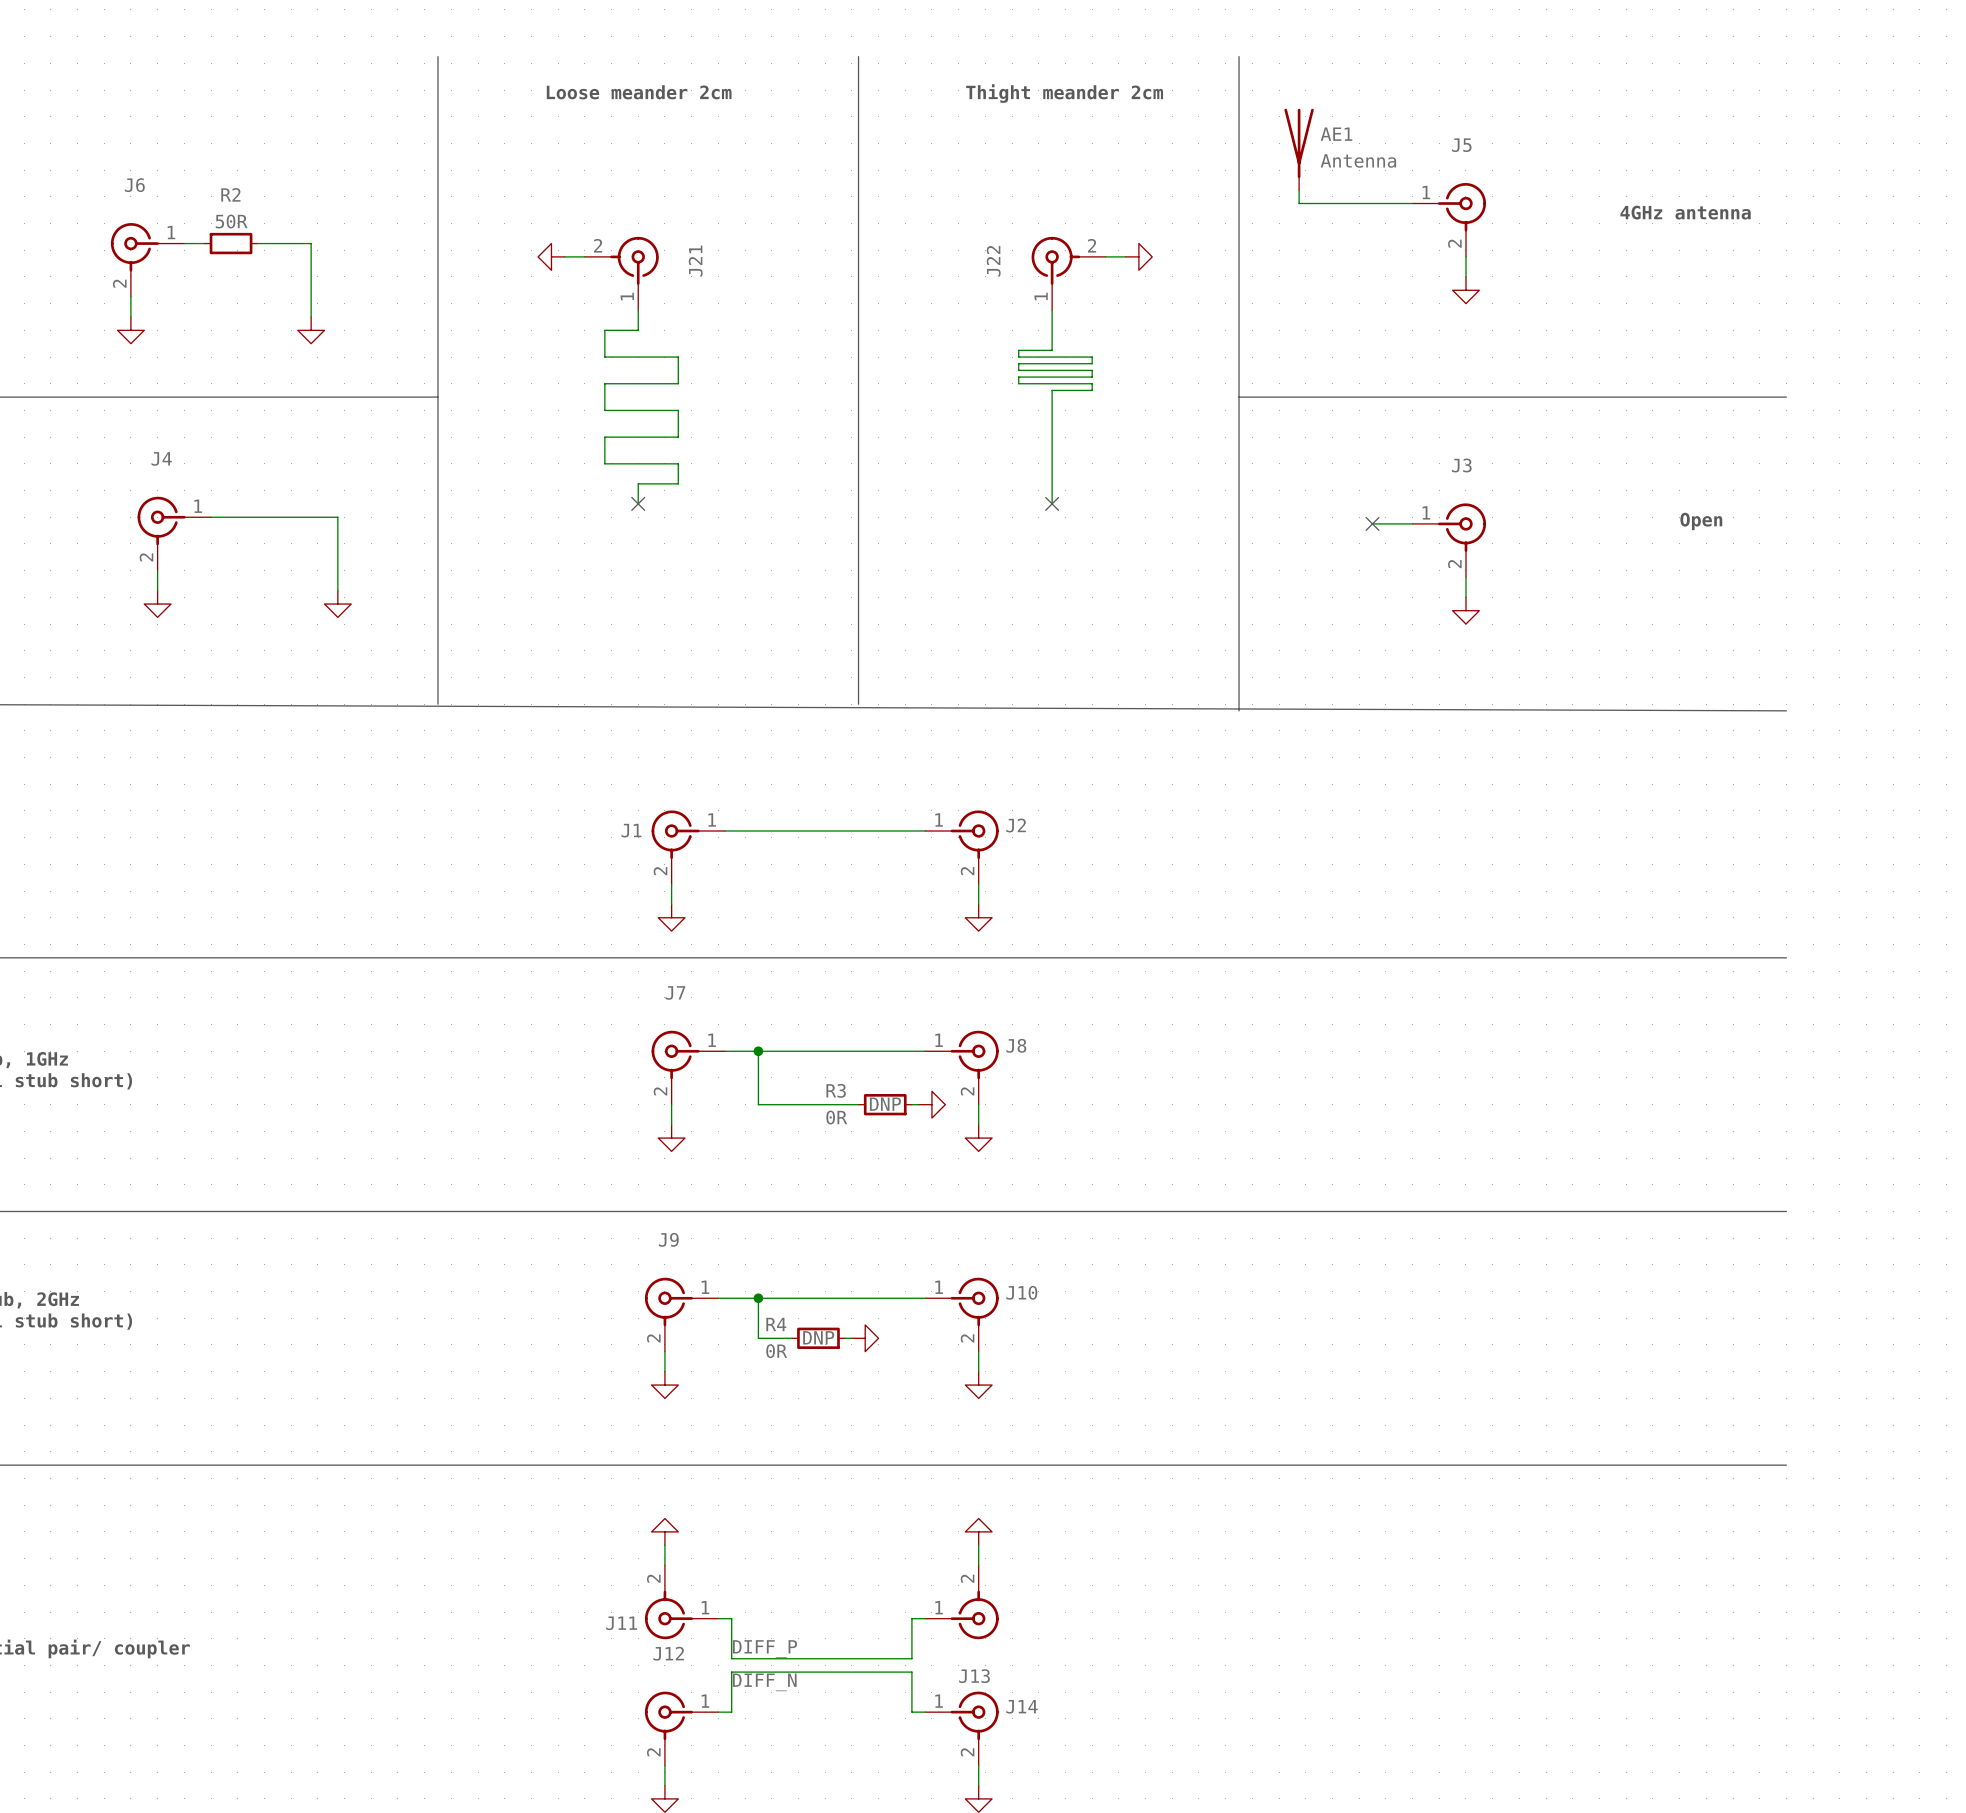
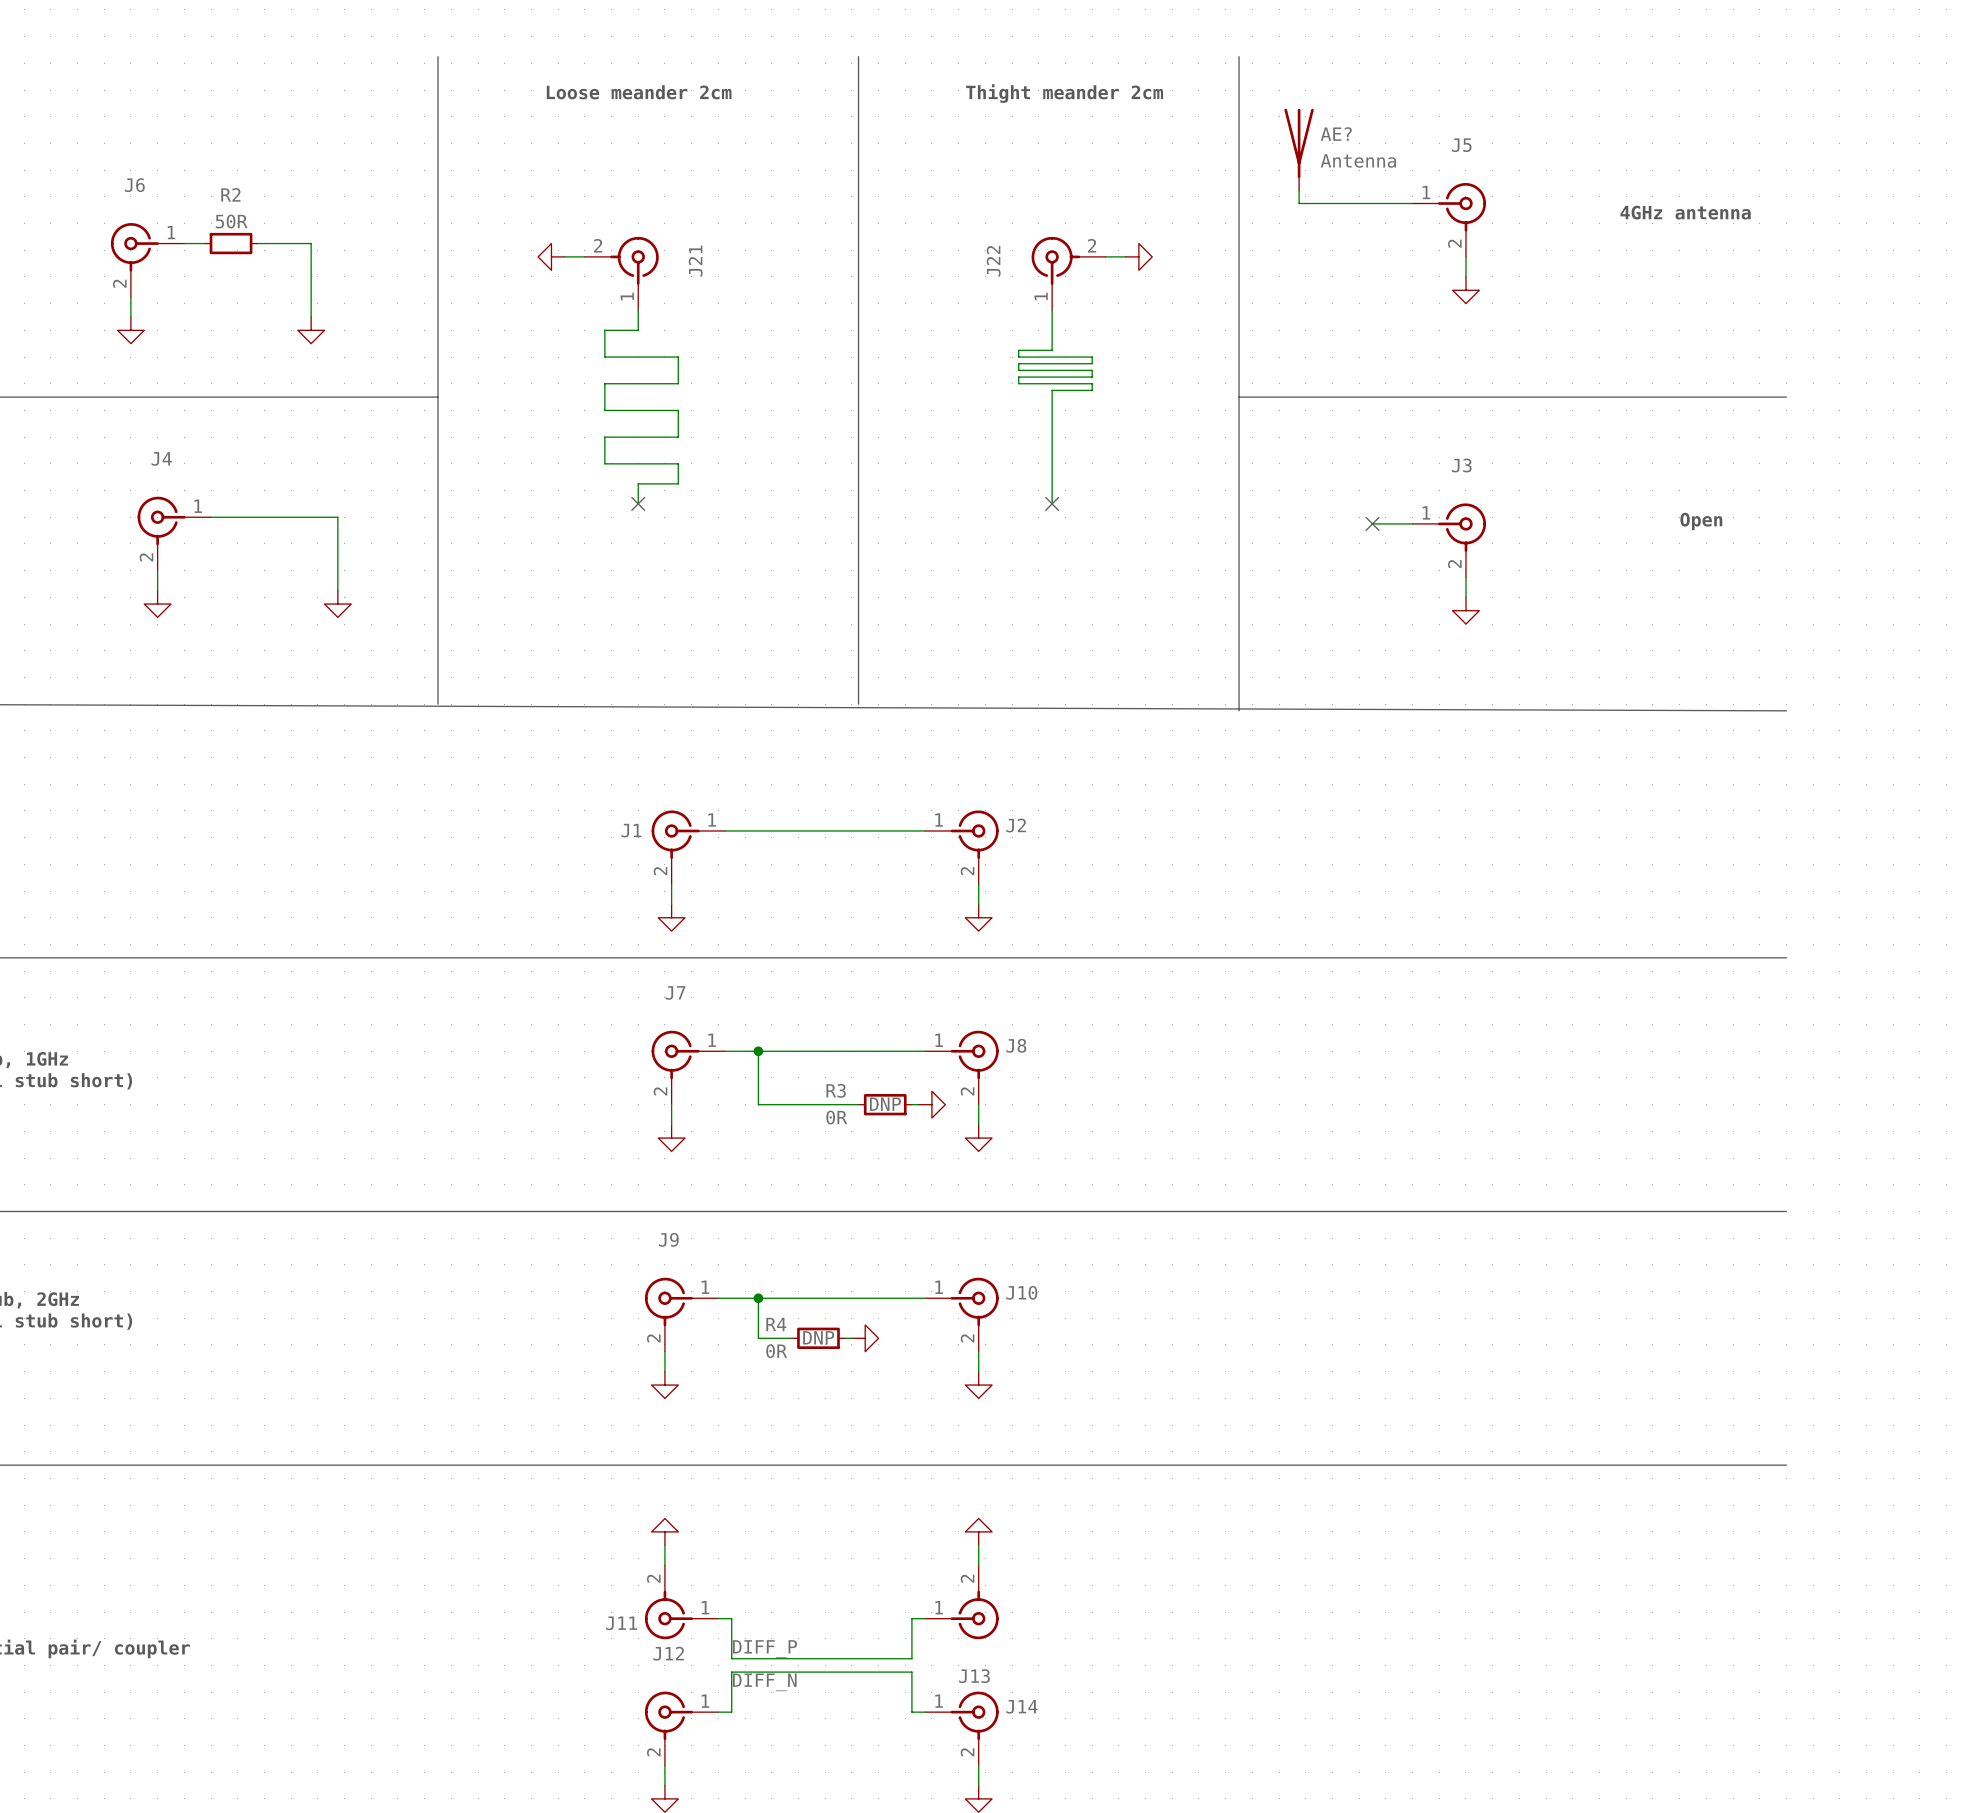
AE1 name: AE1 (1336, 134) -> AE? (1336, 134)

